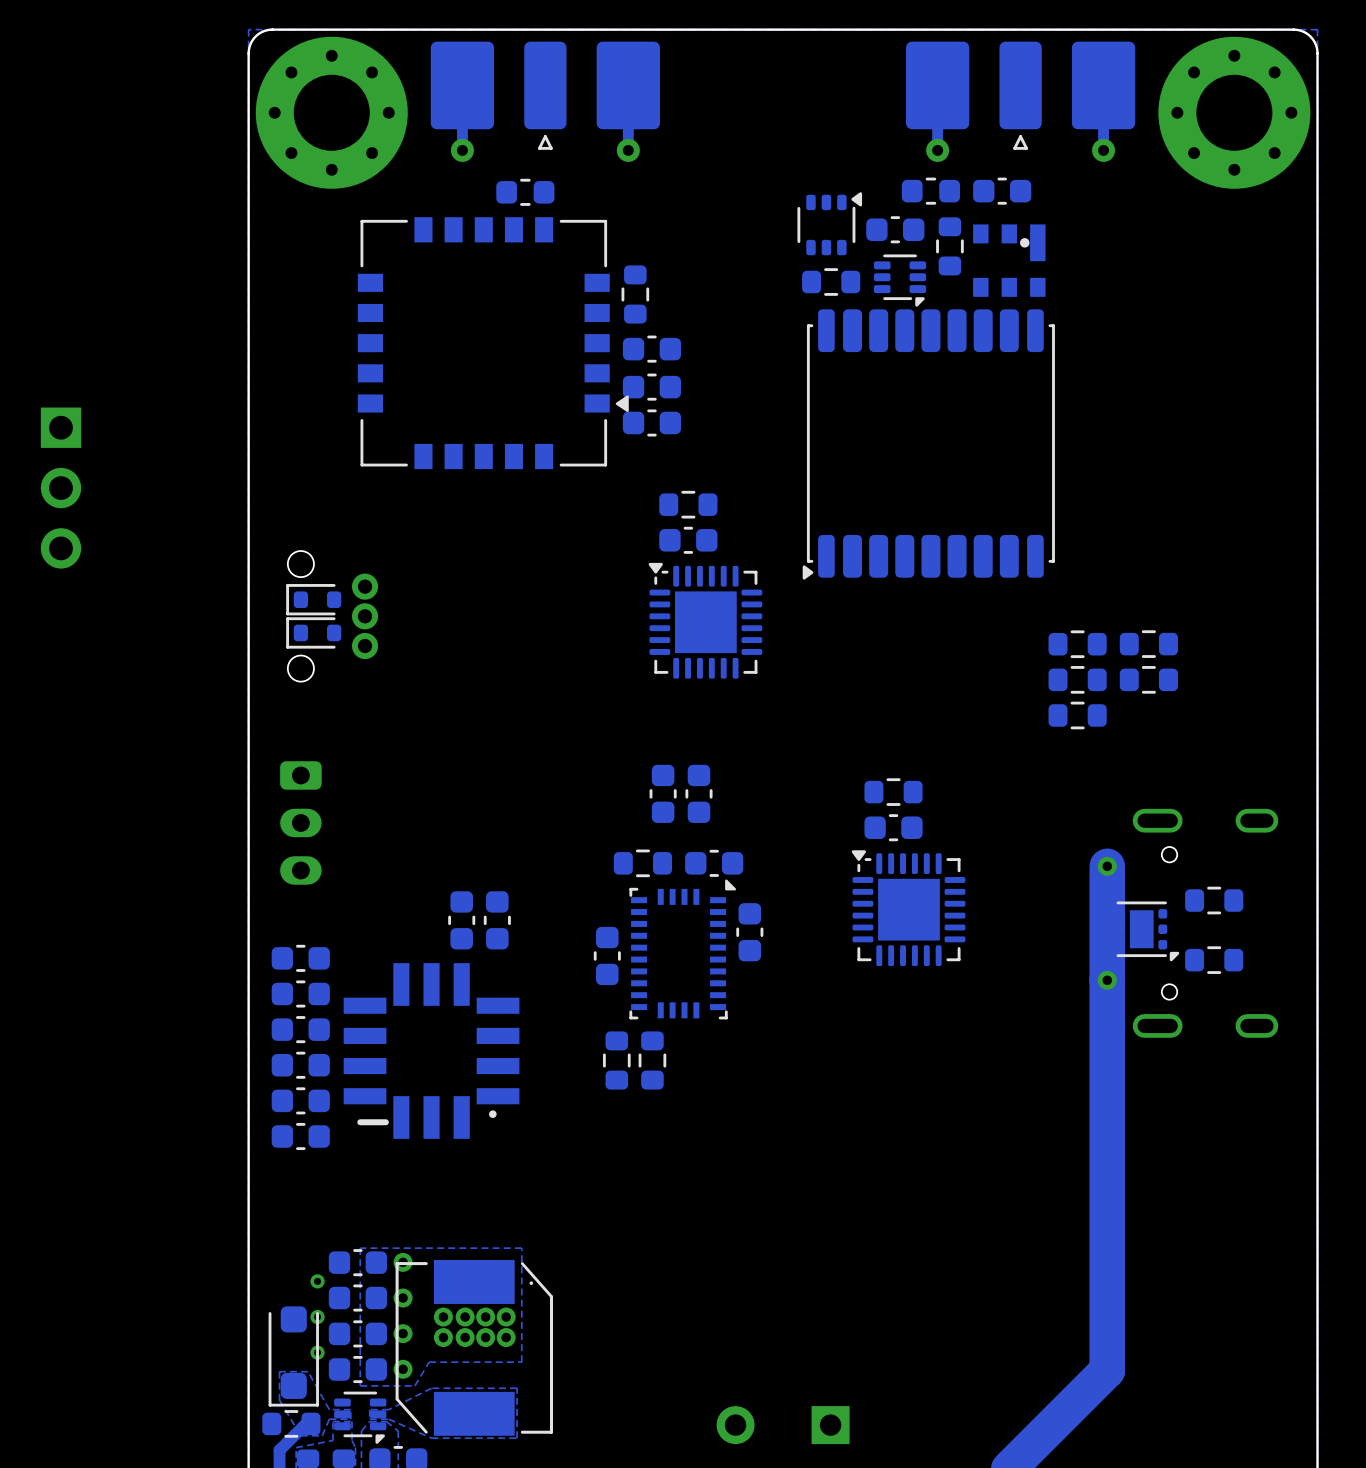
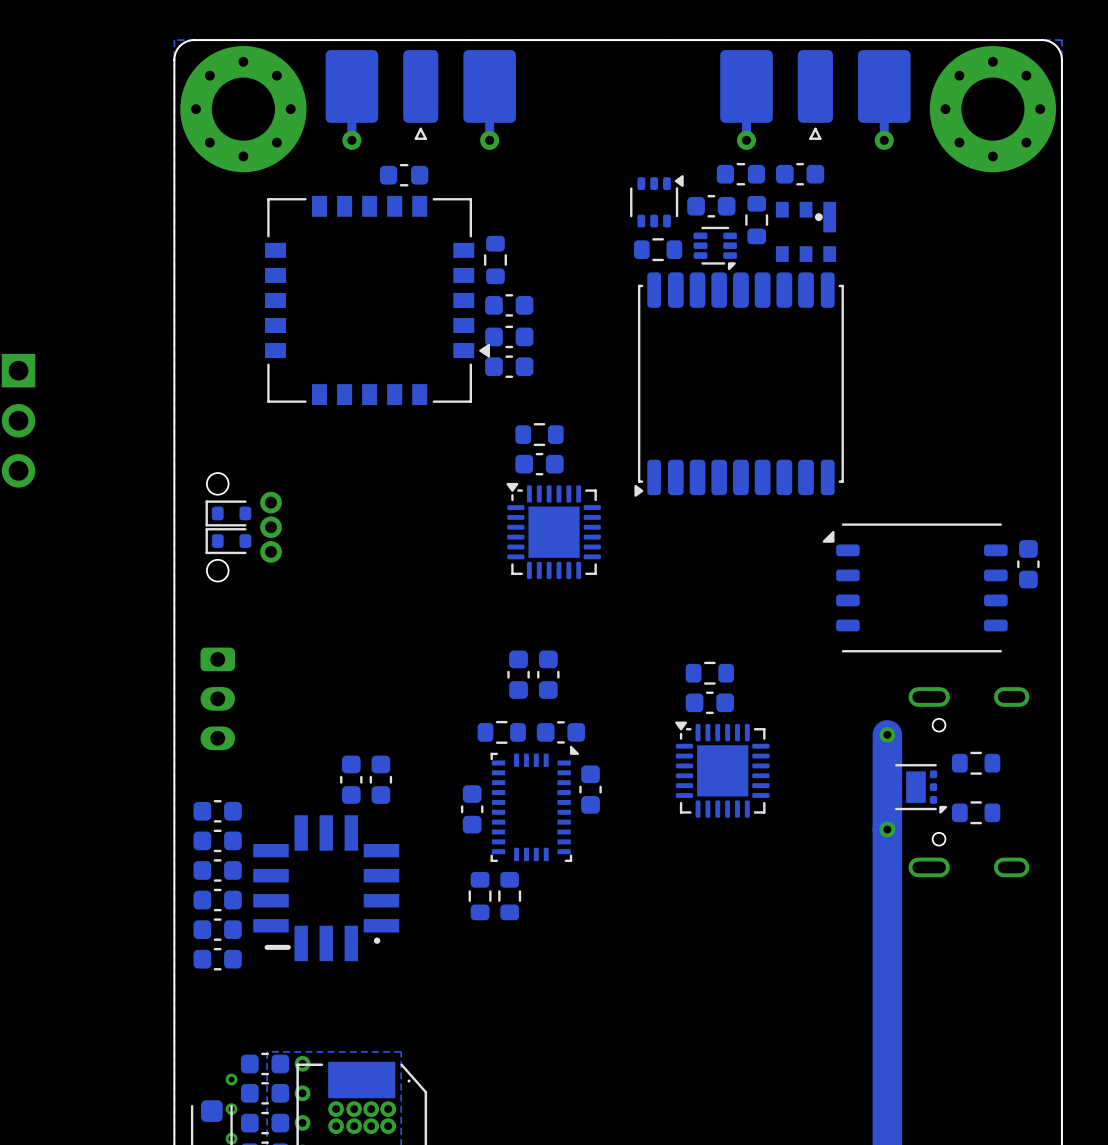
part: (1077, 644) -> none
part: (1148, 644) -> none
part: none -> (1028, 564)
part footprint: [1119, 666, 1178, 694] -> [822, 523, 1008, 653]
part: (1077, 679) -> none
part: (1077, 715) -> none

